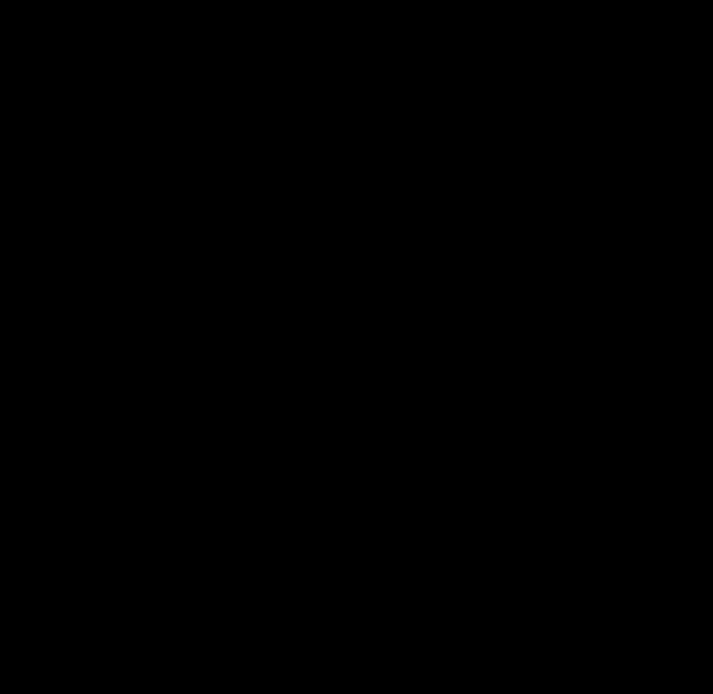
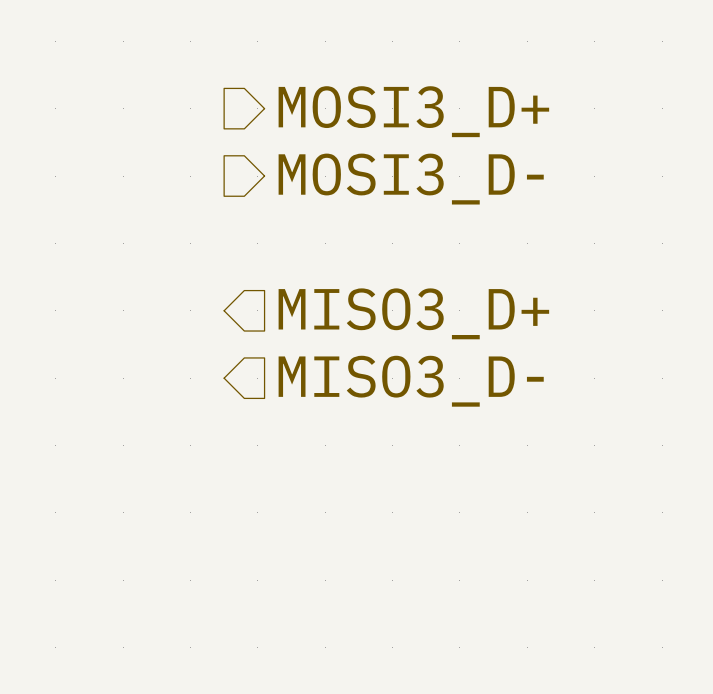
hierarchical label: none -> MOSI3_D+ (413, 111)
hierarchical label: none -> MOSI3_D- (411, 179)
hierarchical label: none -> MISO3_D+ (413, 313)
hierarchical label: none -> MISO3_D- (411, 381)

